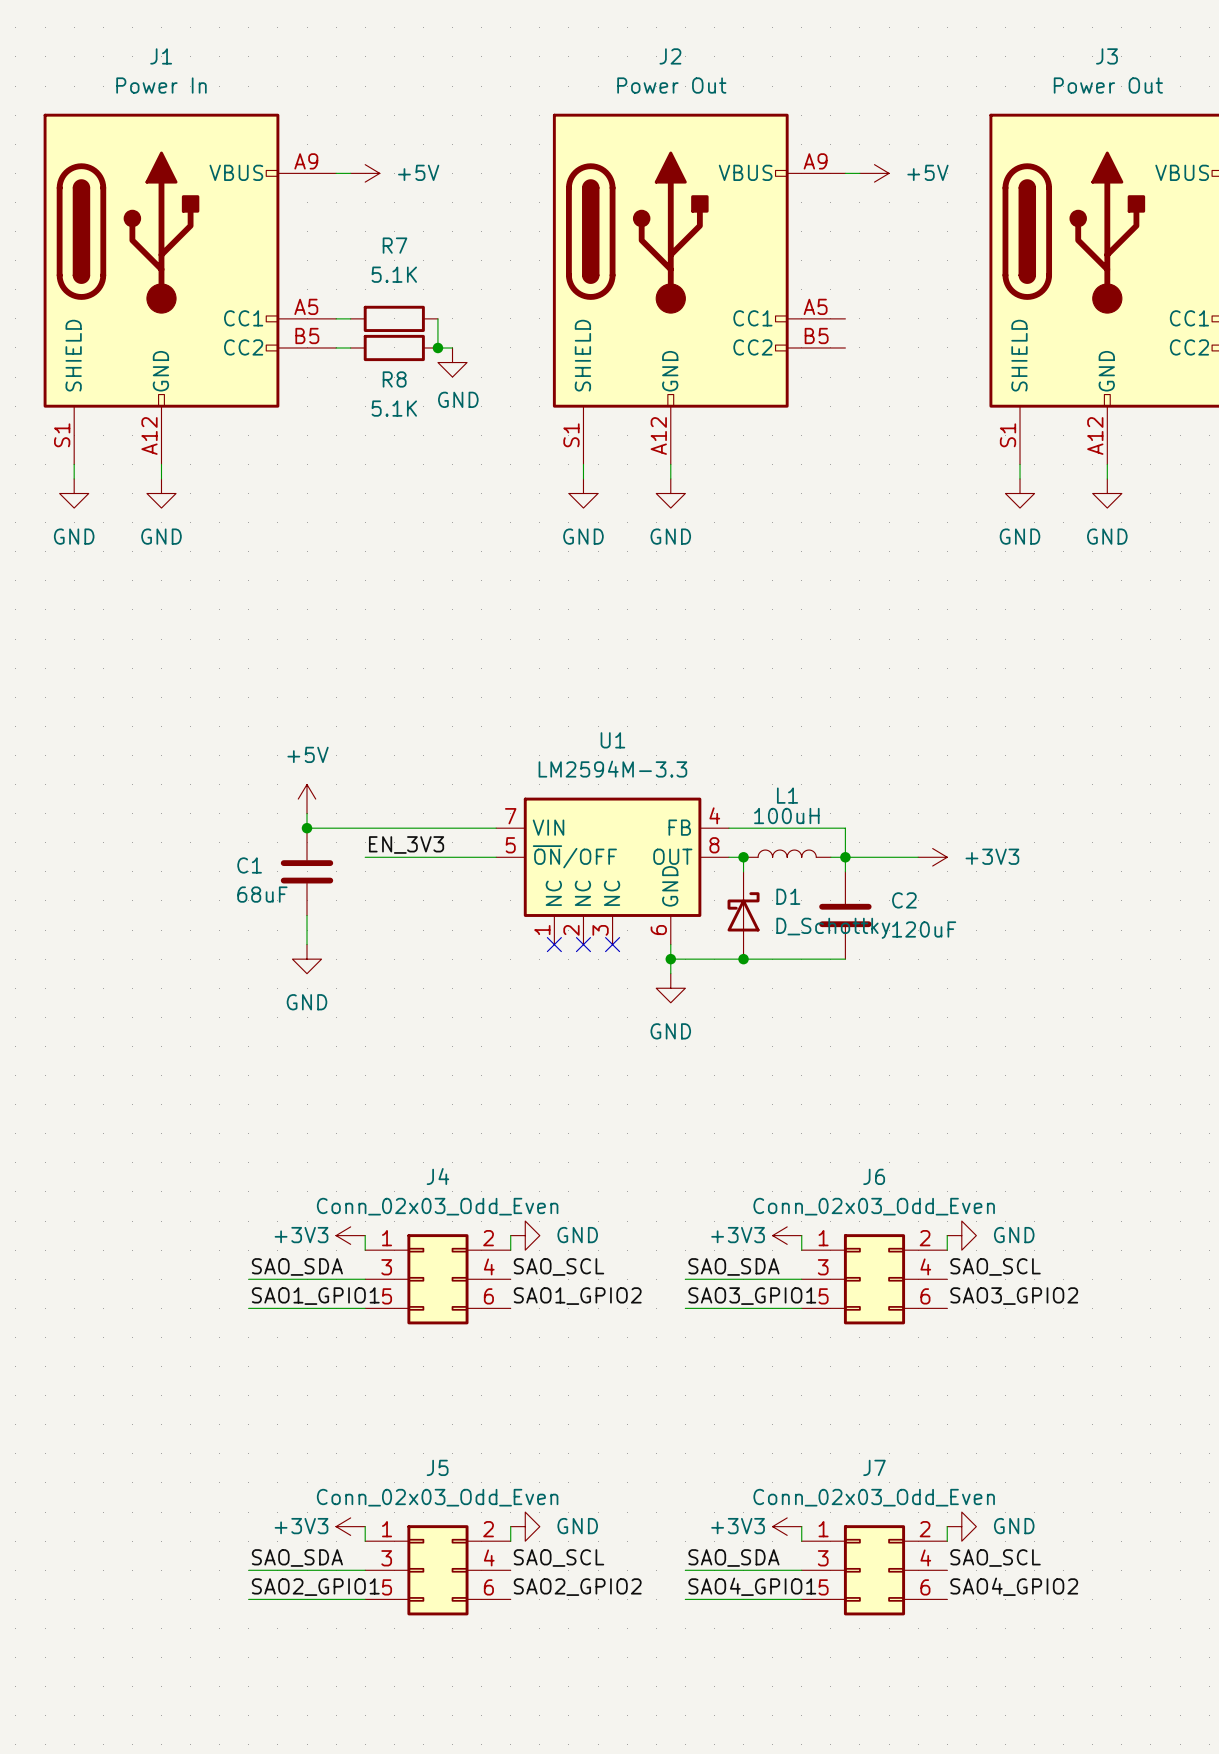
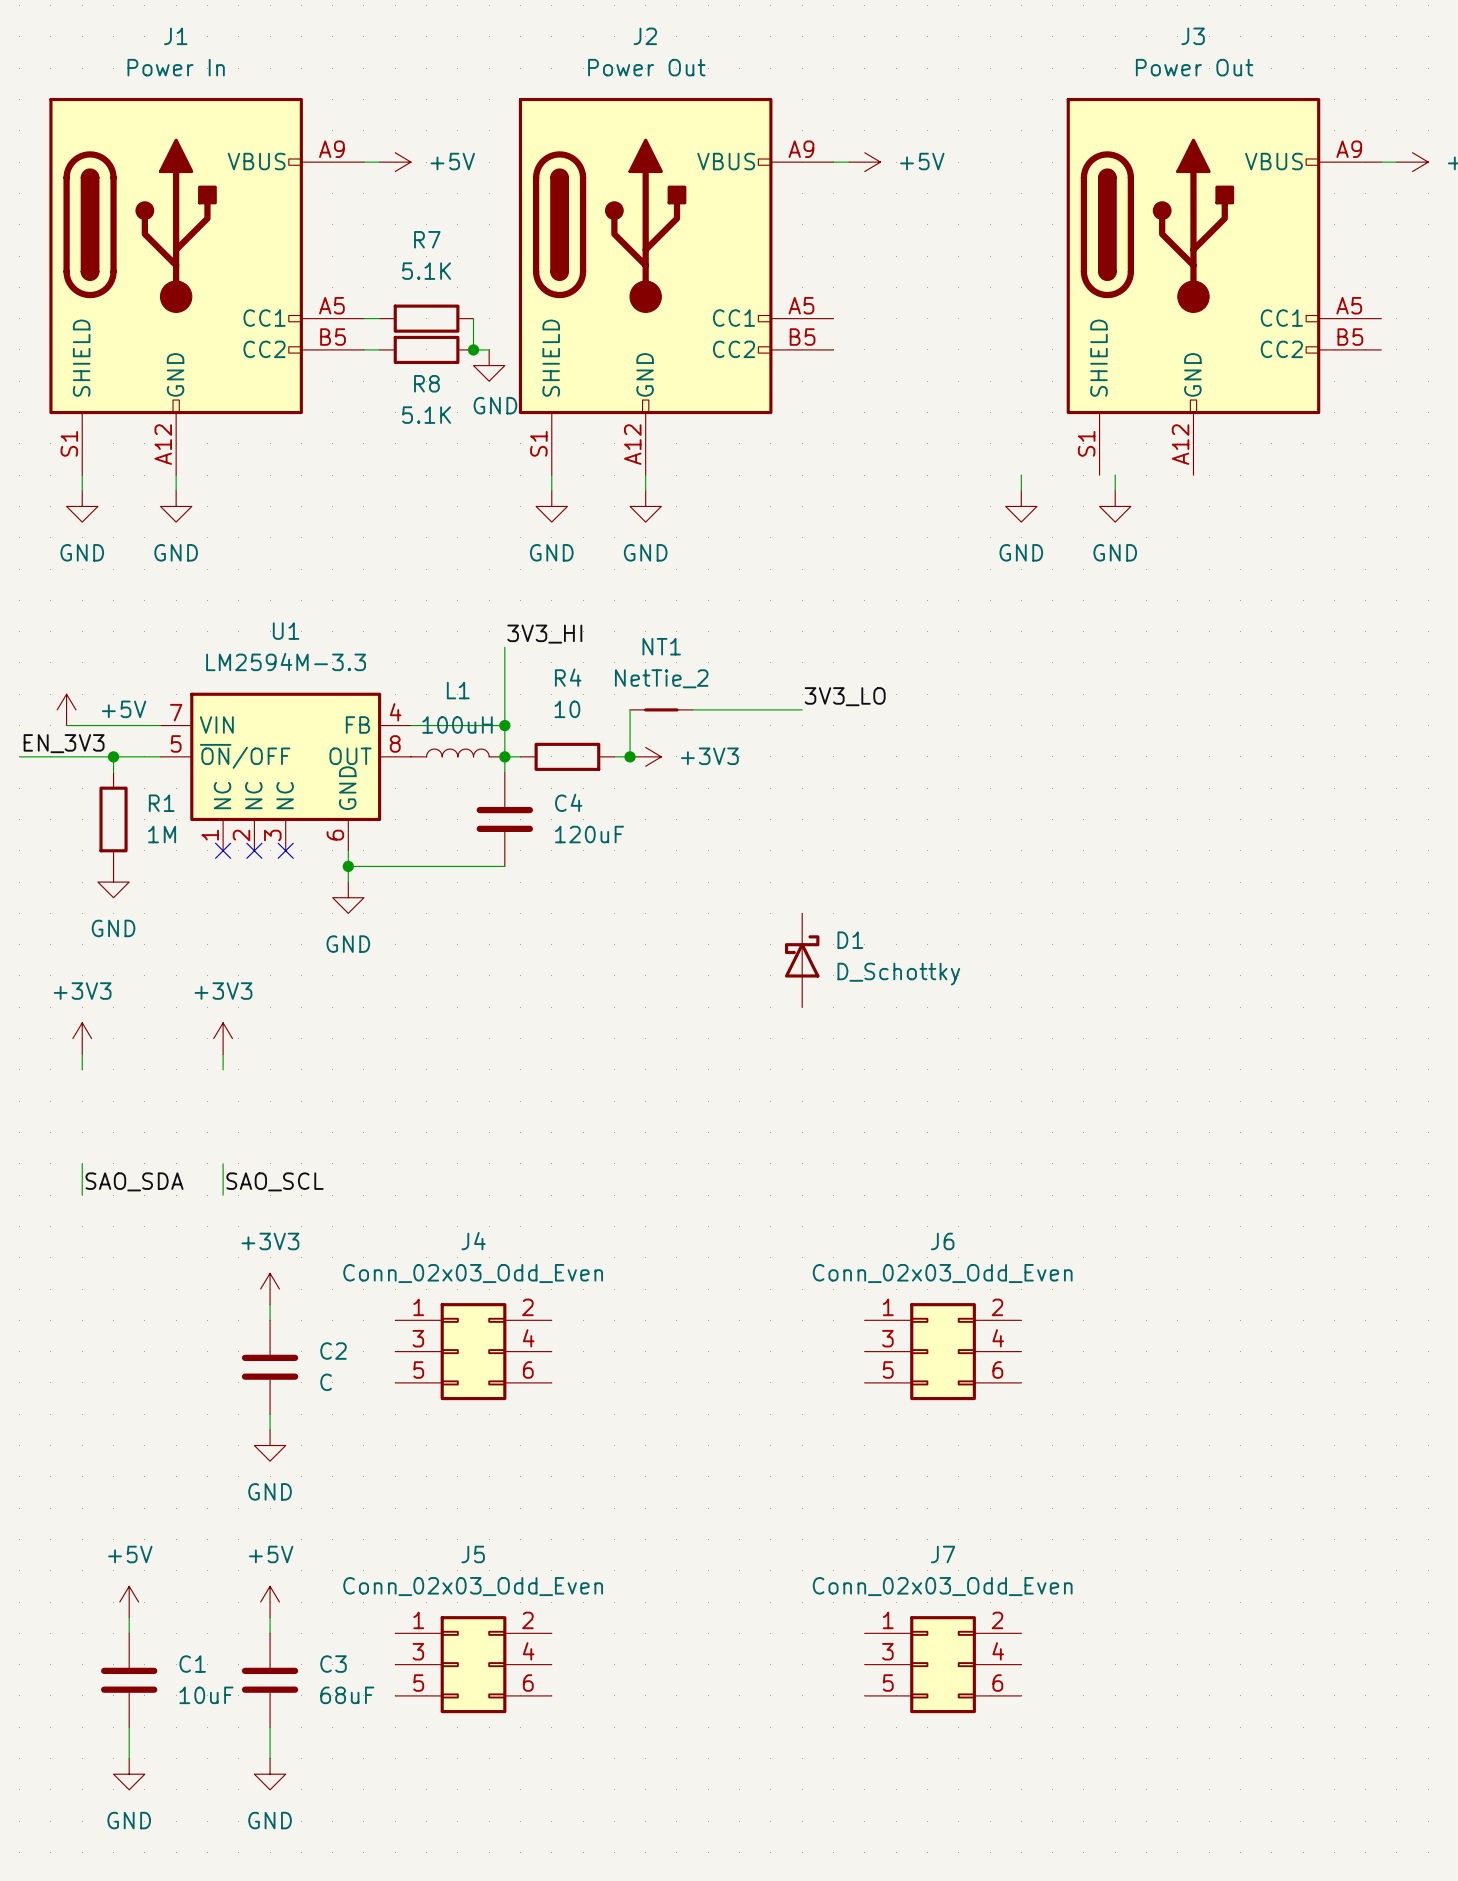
power symbol position: +5V (874, 173) -> +5V (864, 162)
J2 position: (699, 289) -> (676, 286)
wire: (583, 464) (583, 478) -> (551, 475) (551, 490)
wire: (670, 464) (670, 478) -> (645, 475) (645, 490)
wire: (1020, 464) (1020, 478) -> (1021, 475) (1021, 490)
wire: (1107, 464) (1107, 478) -> (1115, 475) (1115, 490)
power symbol: none -> GND (551, 506)
power symbol position: GND (583, 493) -> GND (645, 506)
power symbol: GND (670, 493) -> none
power symbol: none -> GND (1021, 506)
power symbol position: GND (1020, 493) -> GND (1115, 506)
power symbol: GND (1107, 493) -> none
label: none -> 3V3_HI (544, 634)
wire: none -> (504, 647) (504, 772)
label: none -> 3V3_LO (845, 696)
wire: none -> (630, 709) (630, 756) (614, 756)
NT1: none -> NetTie_2 (661, 709)
wire: none -> (692, 709) (802, 709)
wire: none -> (66, 725) (160, 725)
wire: none -> (410, 725) (504, 725)
junction: none -> (504, 725)
label: none -> EN_3V3 (64, 743)
wire: none -> (19, 756) (160, 756)
wire: none -> (113, 756) (113, 772)
junction: none -> (113, 756)
wire: none -> (504, 756) (520, 756)
junction: none -> (504, 756)
R4: none -> 10 (567, 756)
junction: none -> (630, 756)
power symbol: none -> +3V3 (645, 756)
power symbol text position: +5V (308, 754) -> +5V (124, 709)
R1: none -> 1M (113, 819)
C4: none -> 120uF (504, 819)
power symbol position: +5V (307, 799) -> +5V (66, 709)
no-connect mark: none -> (223, 850)
no-connect mark: none -> (254, 850)
no-connect mark: none -> (285, 850)
wire: (307, 813) (307, 828) (321, 828) -> none
L1 value position: 100uH (786, 816) -> 100uH (457, 724)
junction position: (307, 828) -> (348, 866)
wire: (467, 828) (496, 828) -> none
wire: (728, 828) (845, 828) (845, 871) -> none
power symbol: none -> GND (113, 882)
label: EN_3V3 (406, 844) -> none
L1 position: (787, 853) -> (457, 752)
wire: (365, 857) (496, 857) -> none
wire: (728, 857) (743, 857) (743, 871) -> none
junction: (743, 857) -> none
wire: (830, 857) (918, 857) -> none
junction: (845, 857) -> none
power symbol: +3V3 (932, 857) -> none
C1 name position: C1 (249, 865) -> C1 (192, 1664)
C1 position: (307, 871) -> (129, 1680)
U1 position: (612, 871) -> (285, 771)
C1 value: 68uF (262, 894) -> 10uF (206, 1695)
wire: (307, 915) (307, 944) -> (348, 850) (348, 882)
C2 position: (845, 915) -> (270, 1367)
C2 value: 120uF (924, 929) -> C (326, 1382)
no-connect mark: (554, 944) -> none
no-connect mark: (583, 944) -> none
no-connect mark: (612, 944) -> none
wire: (670, 944) (670, 973) -> none
power symbol position: GND (307, 959) -> GND (348, 897)
wire: (670, 959) (845, 959) -> none
junction: (670, 959) -> none
junction: (743, 959) -> none
power symbol: none -> +3V3 (82, 1038)
power symbol: none -> +3V3 (223, 1038)
power symbol: GND (670, 988) -> none
wire: none -> (82, 1054) (82, 1069)
wire: none -> (223, 1054) (223, 1069)
wire: none -> (82, 1163) (82, 1195)
wire: none -> (223, 1163) (223, 1195)
label: none -> SAO_SCL (275, 1181)
power symbol rotation: 0° (350, 1235) -> 90° clockwise (270, 1289)
power symbol position: +3V3 (350, 1235) -> +3V3 (270, 1289)
wire: (365, 1235) (365, 1250) -> (270, 1304) (270, 1320)
wire: (510, 1235) (510, 1250) -> (270, 1414) (270, 1429)
power symbol: GND (525, 1235) -> none
power symbol: +3V3 (787, 1235) -> none
wire: (801, 1235) (801, 1250) -> none
wire: (947, 1235) (947, 1250) -> none
power symbol: GND (961, 1235) -> none
label position: SAO_SDA (297, 1266) -> SAO_SDA (134, 1181)
label: SAO_SCL (558, 1266) -> none
label: SAO_SDA (733, 1266) -> none
label: SAO_SCL (995, 1266) -> none
wire: (248, 1279) (365, 1279) -> none
wire: (685, 1279) (801, 1279) -> none
label: SAO1_GPIO1 (315, 1296) -> none
label: SAO1_GPIO2 (577, 1296) -> none
label: SAO3_GPIO1 (752, 1296) -> none
label: SAO3_GPIO2 (1014, 1296) -> none
wire: (248, 1308) (365, 1308) -> none
wire: (685, 1308) (801, 1308) -> none
power symbol: none -> GND (270, 1445)
power symbol: none -> +5V (129, 1602)
power symbol: none -> +5V (270, 1602)
wire: none -> (129, 1617) (129, 1633)
power symbol: +3V3 (350, 1526) -> none
wire: (365, 1526) (365, 1541) -> (270, 1617) (270, 1633)
wire: (510, 1526) (510, 1541) -> none
power symbol: GND (525, 1526) -> none
power symbol: +3V3 (787, 1526) -> none
wire: (801, 1526) (801, 1541) -> none
wire: (947, 1526) (947, 1541) -> none
power symbol: GND (961, 1526) -> none
label: SAO_SDA (297, 1558) -> none
label: SAO_SCL (558, 1558) -> none
label: SAO_SDA (733, 1558) -> none
label: SAO_SCL (995, 1558) -> none
wire: (248, 1570) (365, 1570) -> none
wire: (685, 1570) (801, 1570) -> none
C3: none -> 68uF (270, 1680)
label: SAO4_GPIO1 (752, 1586) -> none
label: SAO4_GPIO2 (1014, 1586) -> none
label: SAO2_GPIO1 (315, 1587) -> none
label: SAO2_GPIO2 (577, 1587) -> none
wire: (248, 1599) (365, 1599) -> none
wire: (685, 1599) (801, 1599) -> none
wire: none -> (129, 1727) (129, 1758)
wire: none -> (270, 1727) (270, 1758)
power symbol: none -> GND (129, 1774)
power symbol: none -> GND (270, 1774)

